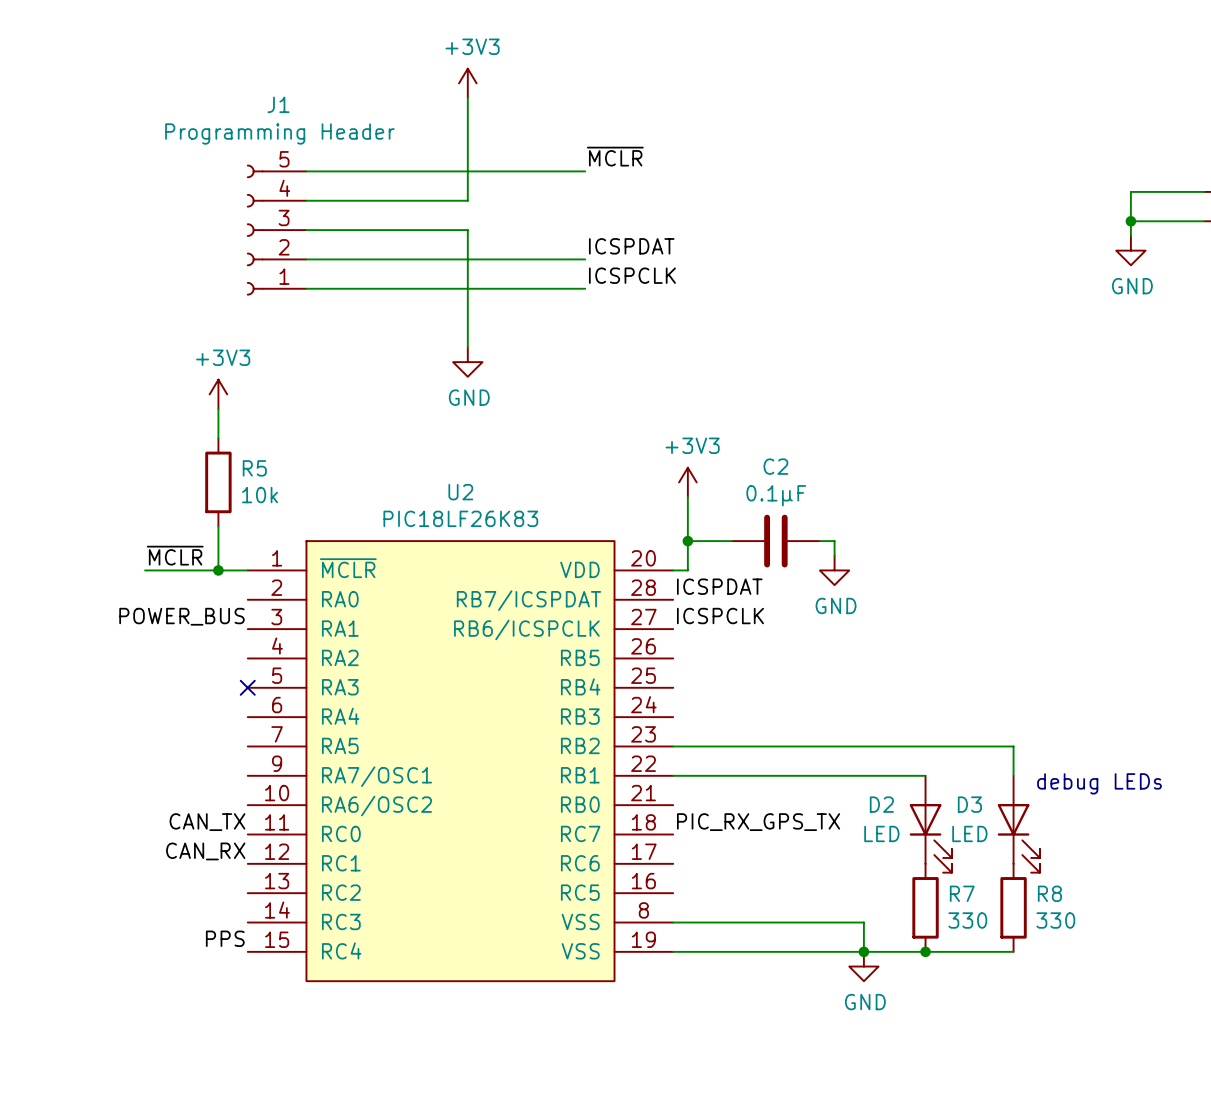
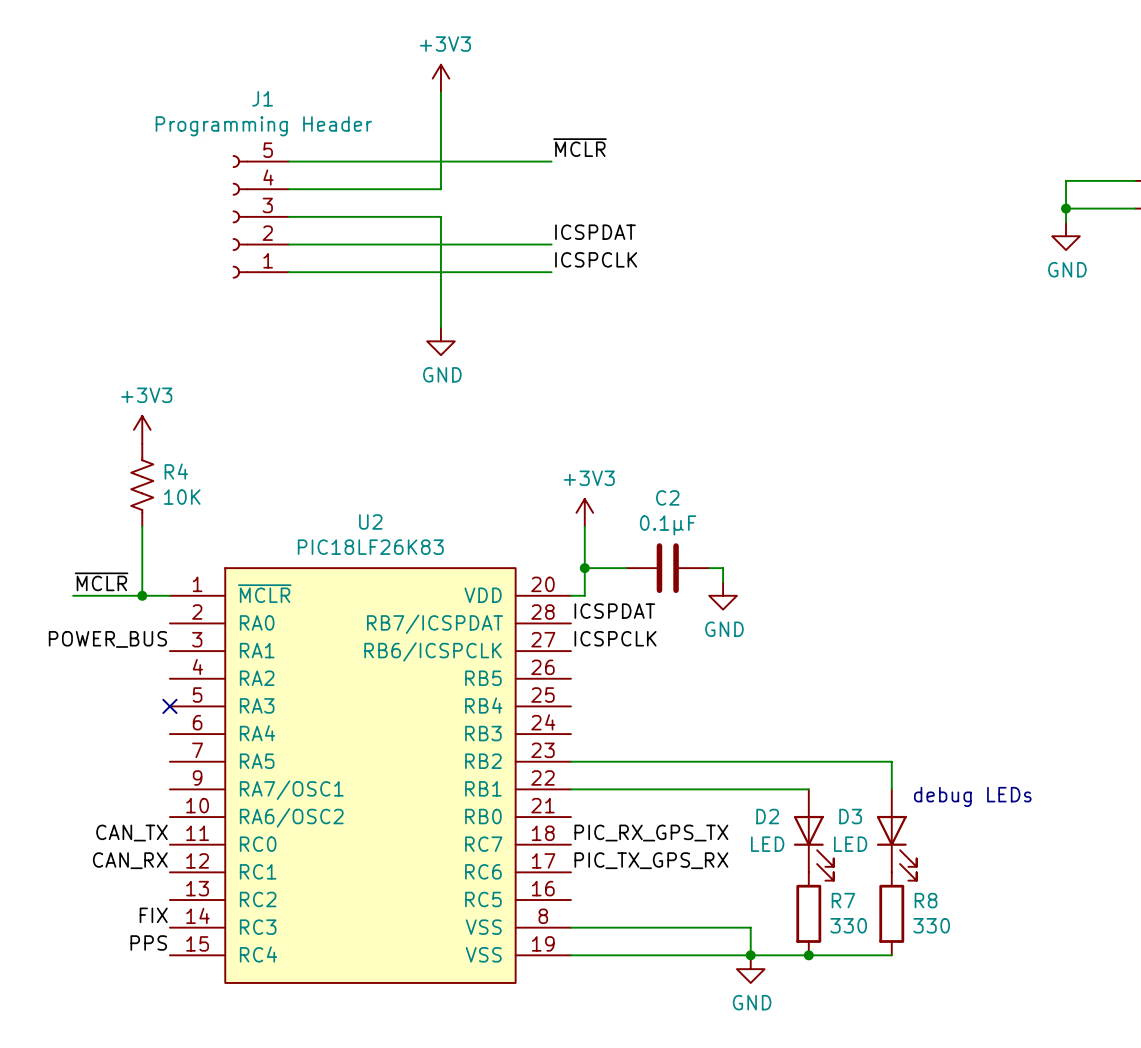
power symbol position: +3V3 (218, 394) -> +3V3 (142, 429)
wire: (218, 409) (218, 438) -> none
R5: 10k (218, 482) -> none
power symbol position: +3V3 (687, 482) -> +3V3 (584, 512)
wire: (687, 497) (687, 570) (673, 570) -> (584, 526) (584, 595) (570, 595)
R4: none -> 10K (142, 485)
wire: (218, 526) (218, 570) -> none
wire: (687, 541) (731, 541) -> (584, 568) (626, 568)
junction: (687, 541) -> none
C2 position: (775, 541) -> (667, 568)
wire: (819, 541) (834, 541) (834, 555) -> (709, 568) (723, 568) (723, 581)
label position: ~{MCLR} (175, 555) -> ~{MCLR} (101, 581)
wire: none -> (142, 526) (142, 595)
wire: (145, 570) (247, 570) -> (73, 595) (169, 595)
junction: (218, 570) -> none
power symbol position: GND (834, 570) -> GND (723, 595)
label position: ICSPDAT (719, 586) -> ICSPDAT (614, 611)
junction: none -> (584, 568)
label position: POWER_BUS (181, 616) -> POWER_BUS (107, 639)
label position: ICSPCLK (720, 616) -> ICSPCLK (615, 638)
junction: none -> (142, 595)
no-connect mark: (247, 687) -> none
wire: (673, 746) (1013, 746) (1013, 775) -> (570, 761) (891, 761) (891, 789)
no-connect mark: none -> (169, 706)
U2 position: (460, 761) -> (370, 775)
wire: (673, 775) (925, 775) -> (570, 789) (808, 789)
text position: debug LEDs (1099, 783) -> debug LEDs (972, 796)
label position: CAN_TX (207, 822) -> CAN_TX (131, 833)
label position: PIC_RX_GPS_TX (758, 822) -> PIC_RX_GPS_TX (651, 833)
D2 position: (930, 824) -> (813, 835)
D3 position: (1018, 824) -> (896, 835)
label position: CAN_RX (205, 851) -> CAN_RX (130, 860)
R7 position: (925, 907) -> (808, 913)
R8 position: (1013, 907) -> (891, 913)
label: none -> PIC_TX_GPS_RX (651, 860)
wire: (673, 922) (863, 922) (863, 951) -> (570, 927) (750, 927) (750, 955)
label position: PPS (225, 938) -> PPS (148, 942)
wire: (673, 951) (1013, 951) -> (570, 955) (891, 955)
junction: (863, 951) -> none
junction: (925, 951) -> none
power symbol position: GND (863, 966) -> GND (750, 969)
label: none -> FIX (153, 915)
junction: none -> (750, 955)
junction: none -> (808, 955)

